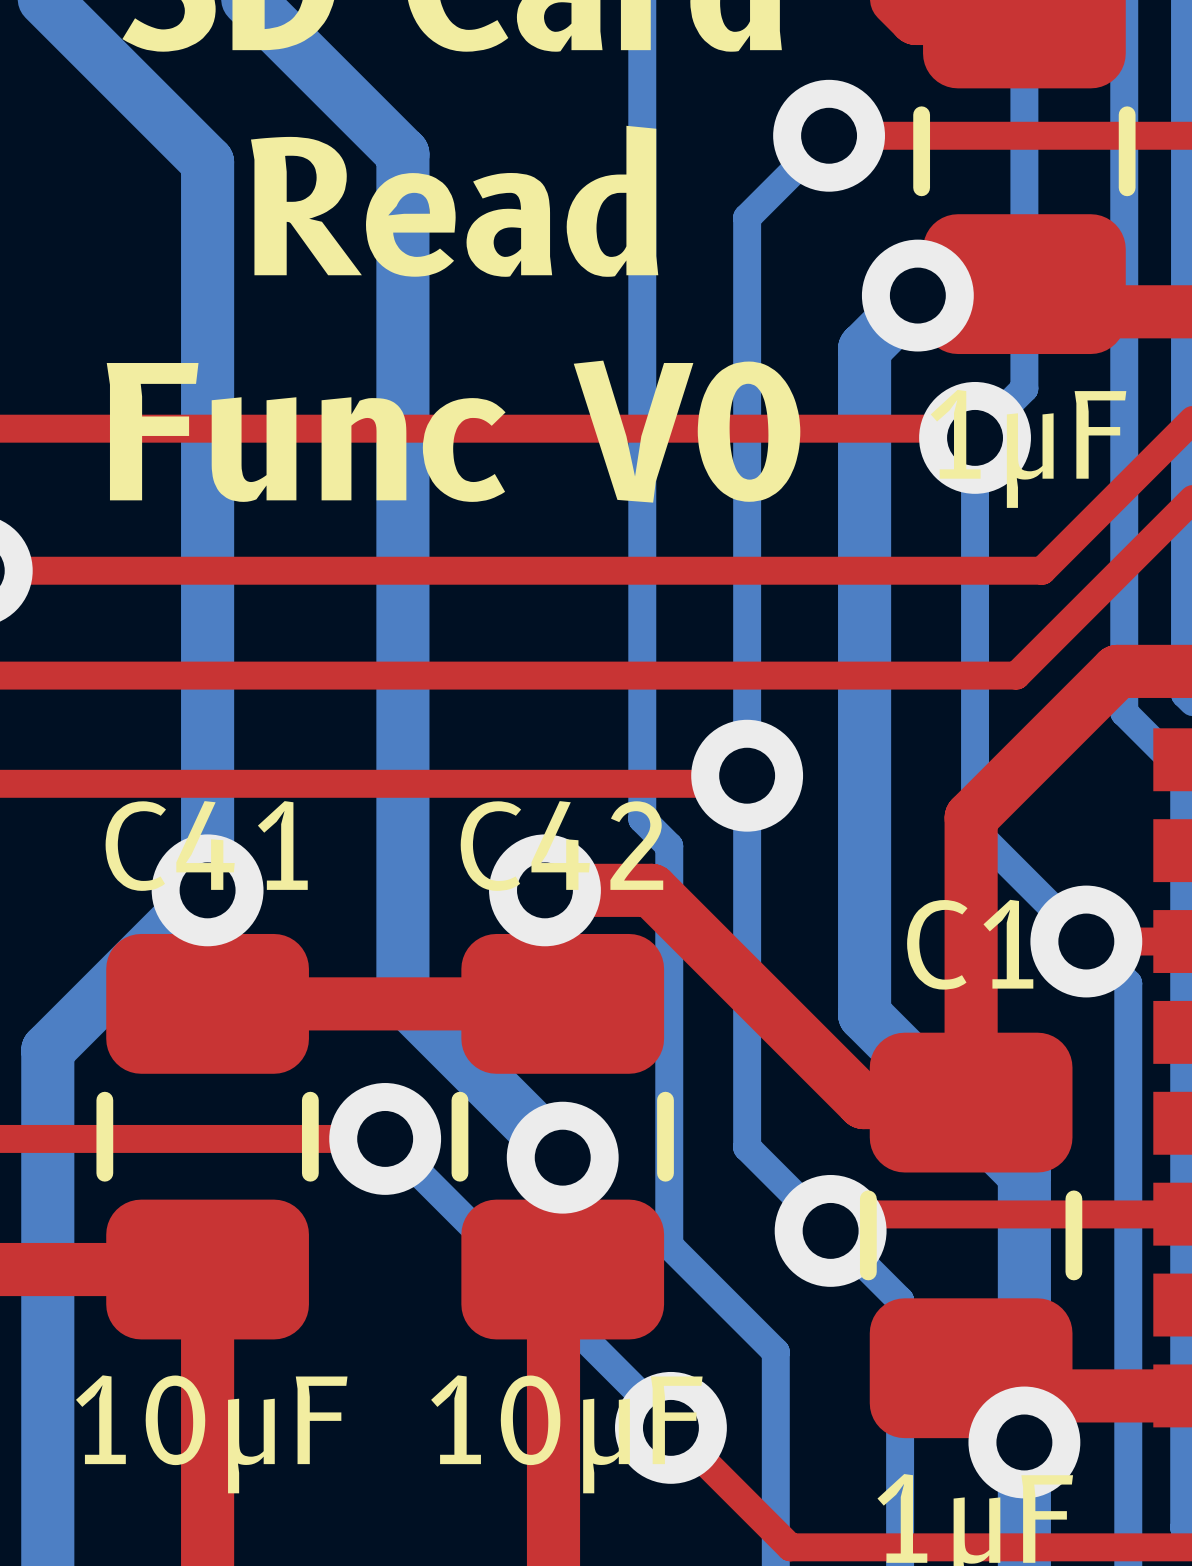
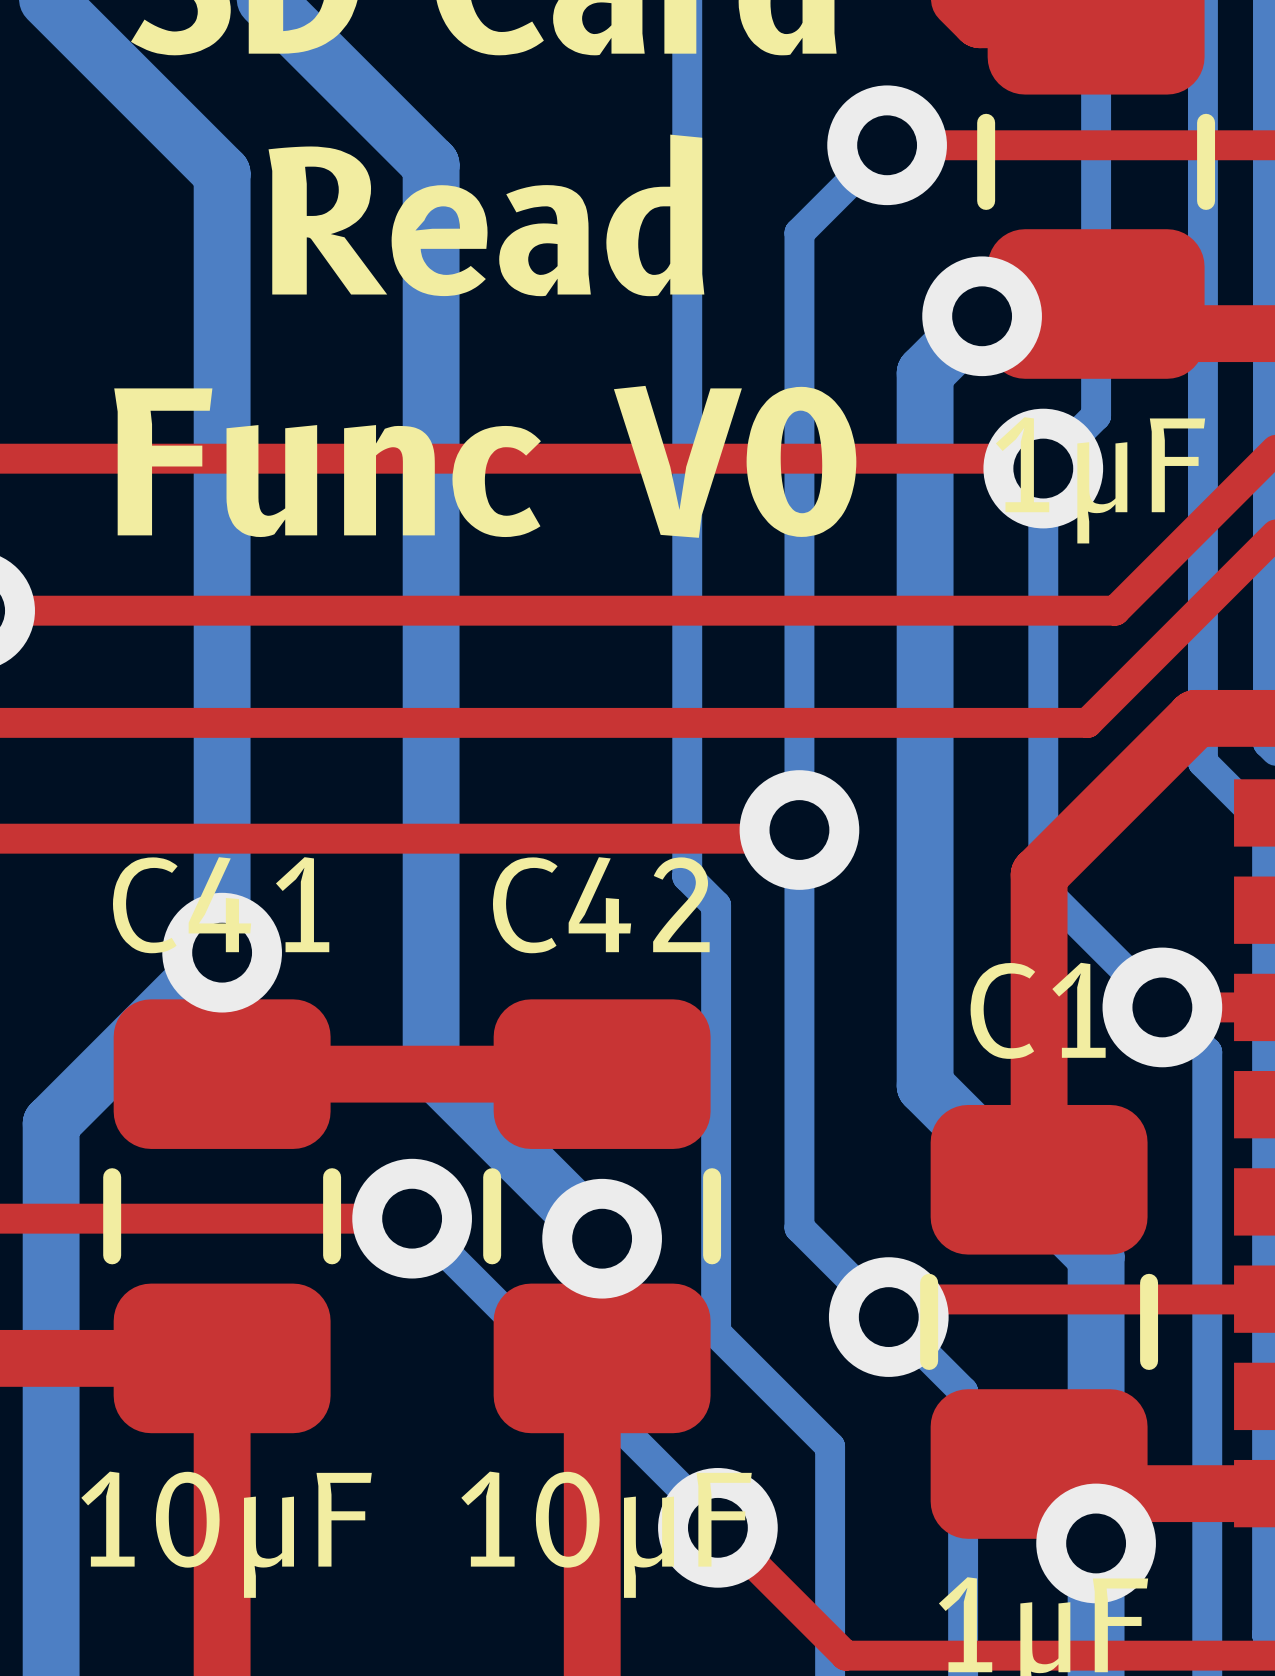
top track: (544, 890) (651, 890) (863, 1102) (971, 1102) -> none
via: (544, 890) -> none

